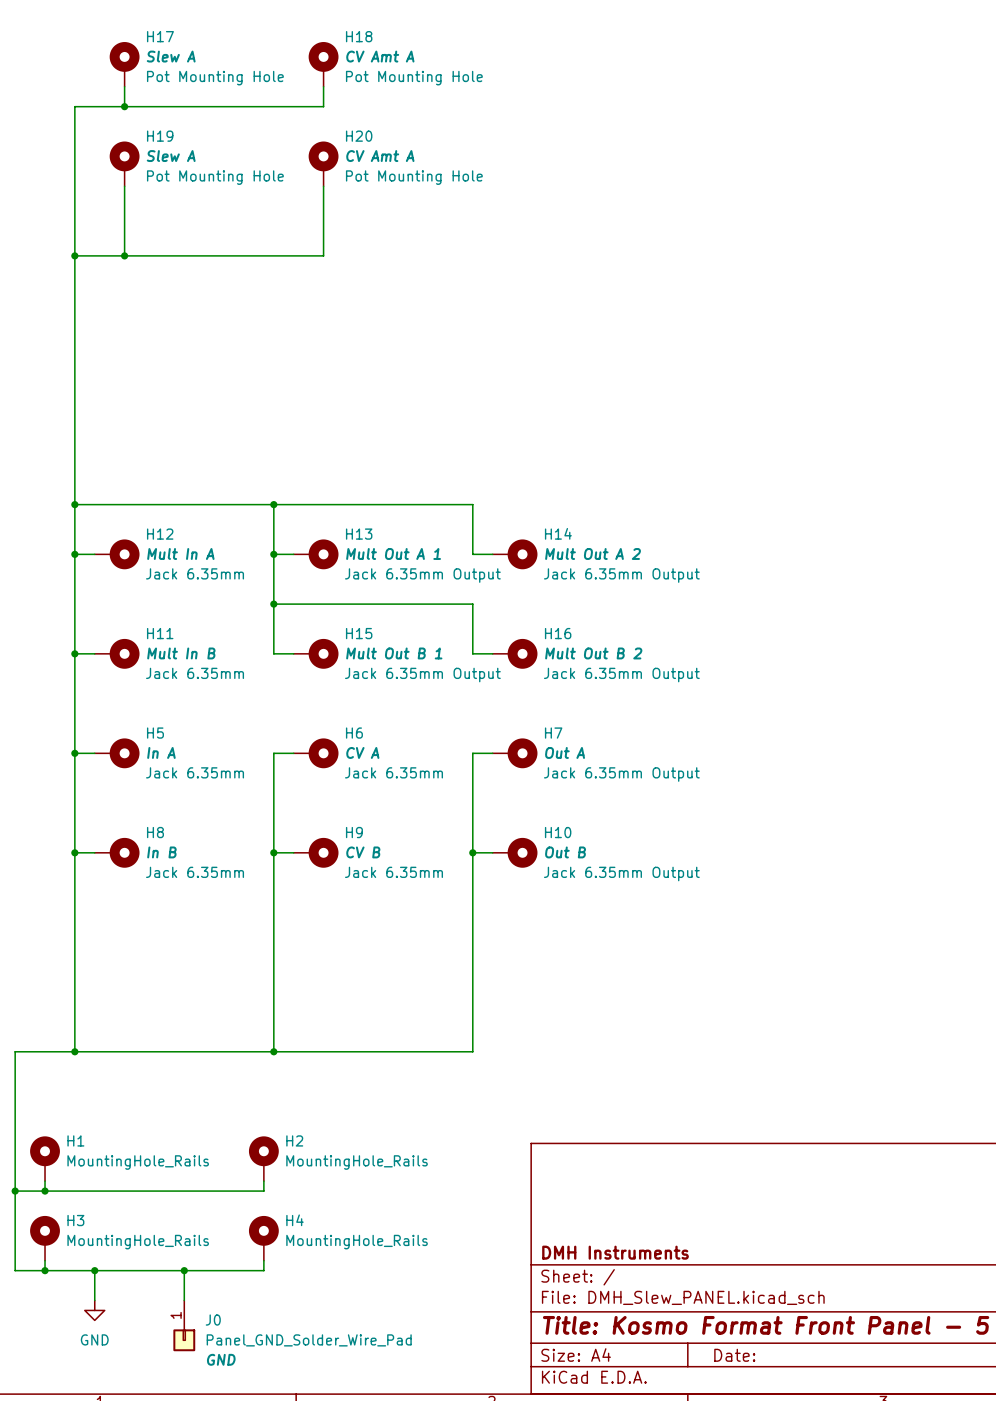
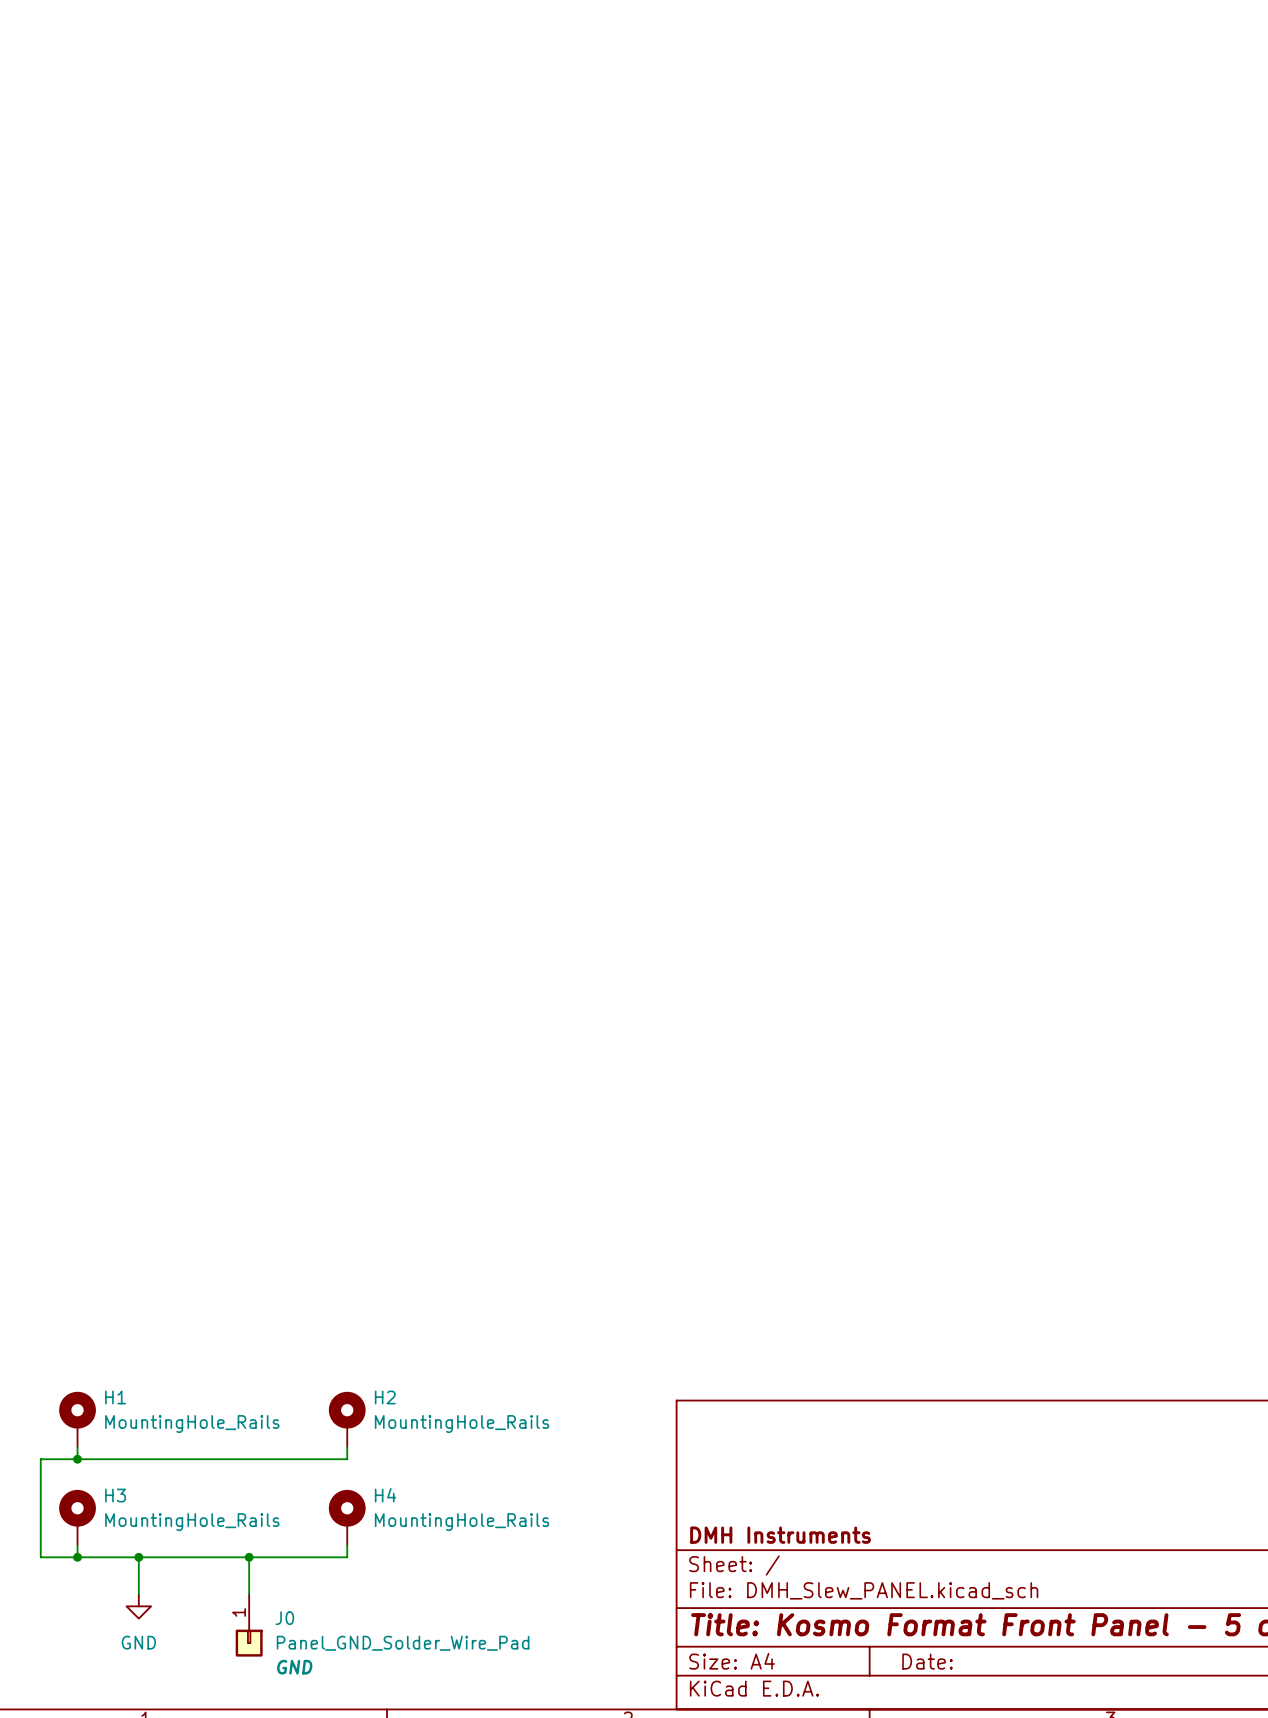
H17: Slew A (124, 64) -> none
H18: CV Amt A (323, 64) -> none
wire: (124, 86) (124, 106) -> none
wire: (323, 86) (323, 106) (74, 106) (74, 1051) -> none
junction: (124, 106) -> none
H19: Slew A (124, 163) -> none
H20: CV Amt A (323, 163) -> none
wire: (124, 186) (124, 255) -> none
wire: (323, 186) (323, 255) (74, 255) -> none
junction: (74, 255) -> none
junction: (124, 255) -> none
wire: (74, 504) (472, 504) (472, 554) (492, 554) -> none
junction: (74, 504) -> none
wire: (273, 504) (273, 653) (293, 653) -> none
junction: (273, 504) -> none
wire: (74, 554) (94, 554) -> none
junction: (74, 554) -> none
H12: Mult In A (117, 554) -> none
wire: (273, 554) (293, 554) -> none
junction: (273, 554) -> none
H13: Mult Out A 1 (316, 554) -> none
H14: Mult Out A 2 (515, 554) -> none
wire: (273, 604) (472, 604) (472, 653) (492, 653) -> none
junction: (273, 604) -> none
wire: (74, 653) (94, 653) -> none
junction: (74, 653) -> none
H11: Mult In B (117, 653) -> none
H15: Mult Out B 1 (316, 653) -> none
H16: Mult Out B 2 (515, 653) -> none
wire: (74, 753) (94, 753) -> none
junction: (74, 753) -> none
H5: In A (117, 753) -> none
wire: (293, 753) (273, 753) (273, 1051) -> none
H6: CV A (316, 753) -> none
wire: (492, 753) (472, 753) (472, 1051) (15, 1051) (15, 1191) -> none
H7: Out A (515, 753) -> none
wire: (74, 852) (94, 852) -> none
junction: (74, 852) -> none
H8: In B (117, 852) -> none
wire: (273, 852) (293, 852) -> none
junction: (273, 852) -> none
H9: CV B (316, 852) -> none
wire: (472, 852) (492, 852) -> none
junction: (472, 852) -> none
H10: Out B (515, 852) -> none
junction: (74, 1051) -> none
junction: (273, 1051) -> none
junction: (15, 1191) -> none

